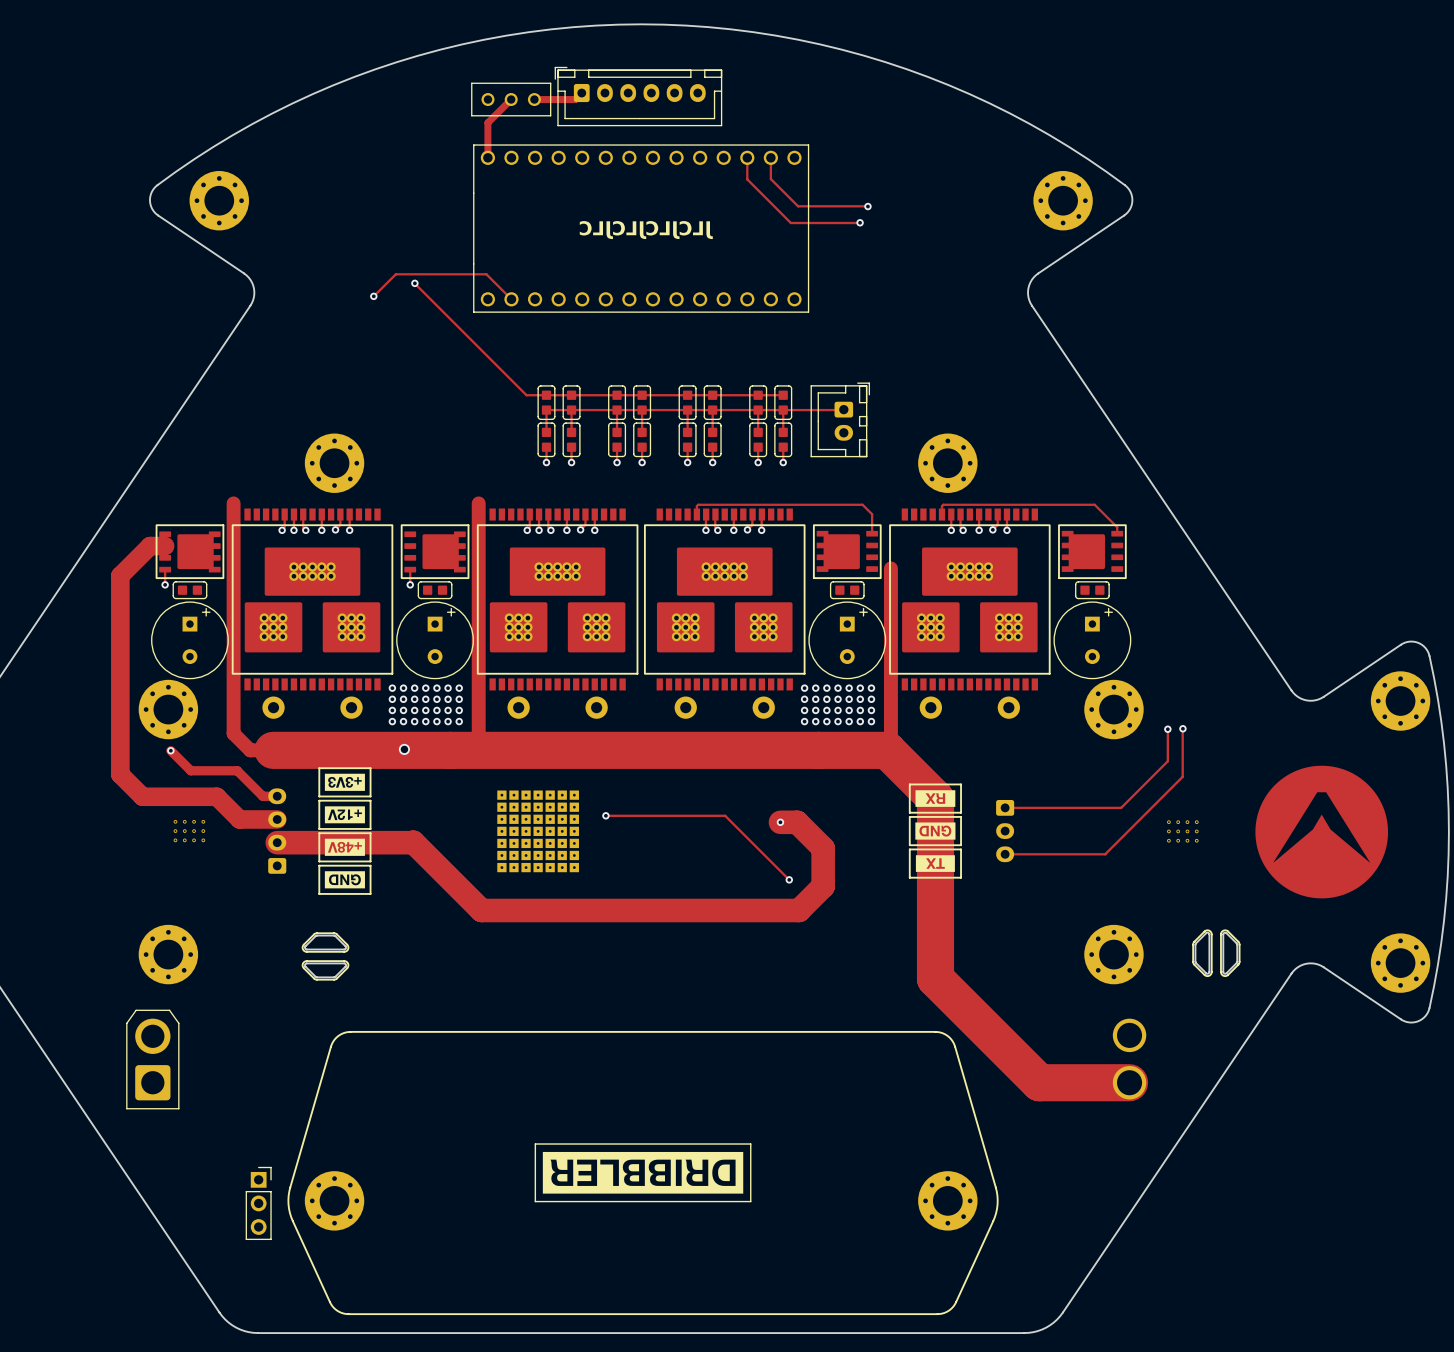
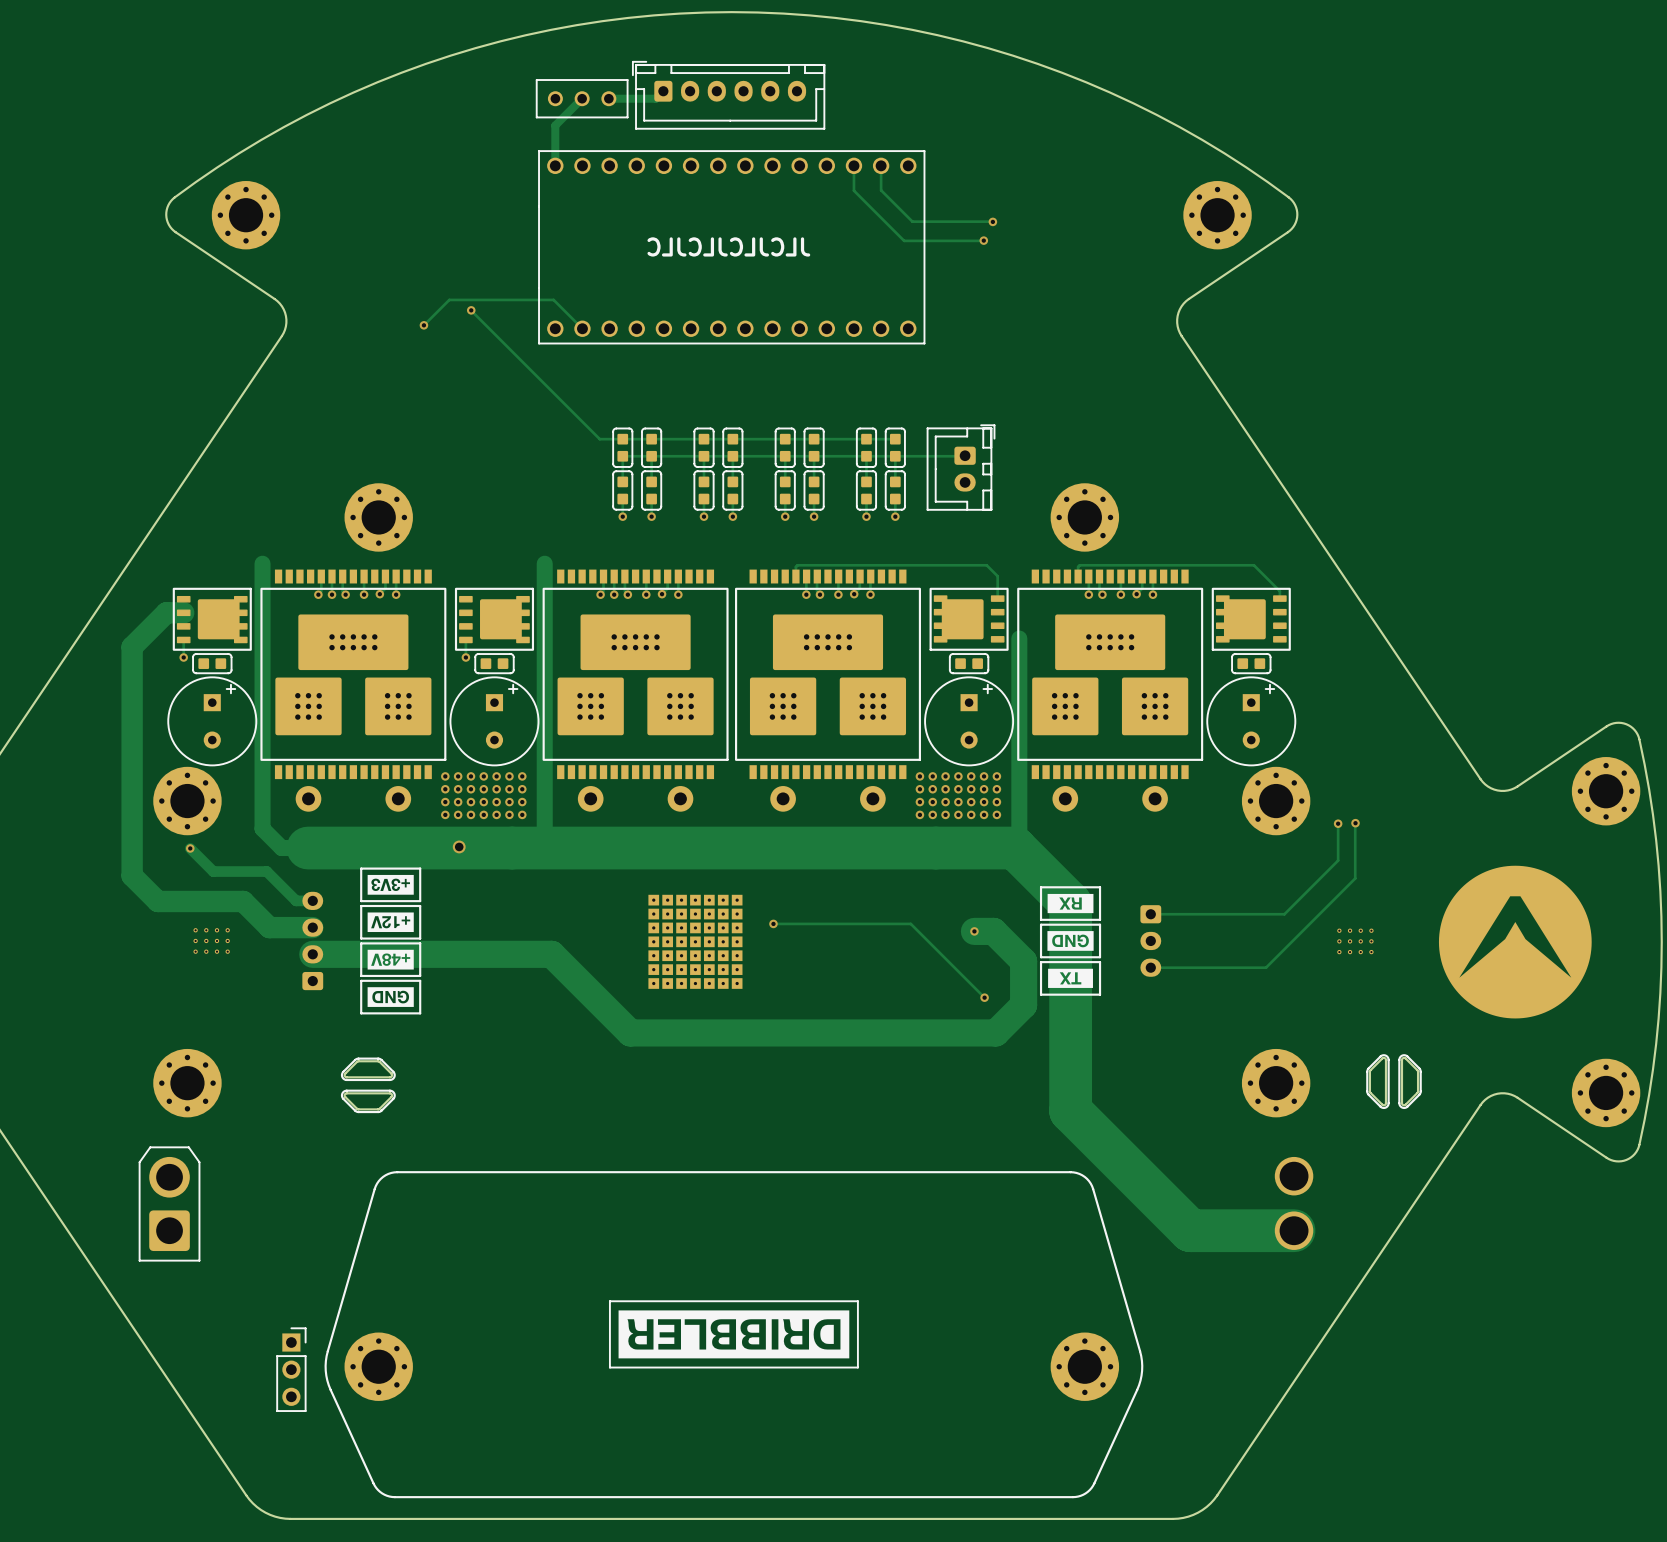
track: (605, 815) (725, 815) (789, 879) -> (773, 923) (910, 923) (984, 997)
via: (605, 815) -> none
via: none -> (773, 923)
track: (780, 822) (797, 822) (823, 848) (823, 886) (799, 910) (481, 910) (412, 842) -> (974, 931) (993, 931) (1023, 961) (1023, 1005) (995, 1032) (630, 1032) (551, 954) (468, 954)
via: (780, 822) -> none
via: none -> (974, 931)
part position: (538, 831) -> (695, 941)
via: (789, 879) -> none
via: none -> (984, 997)

